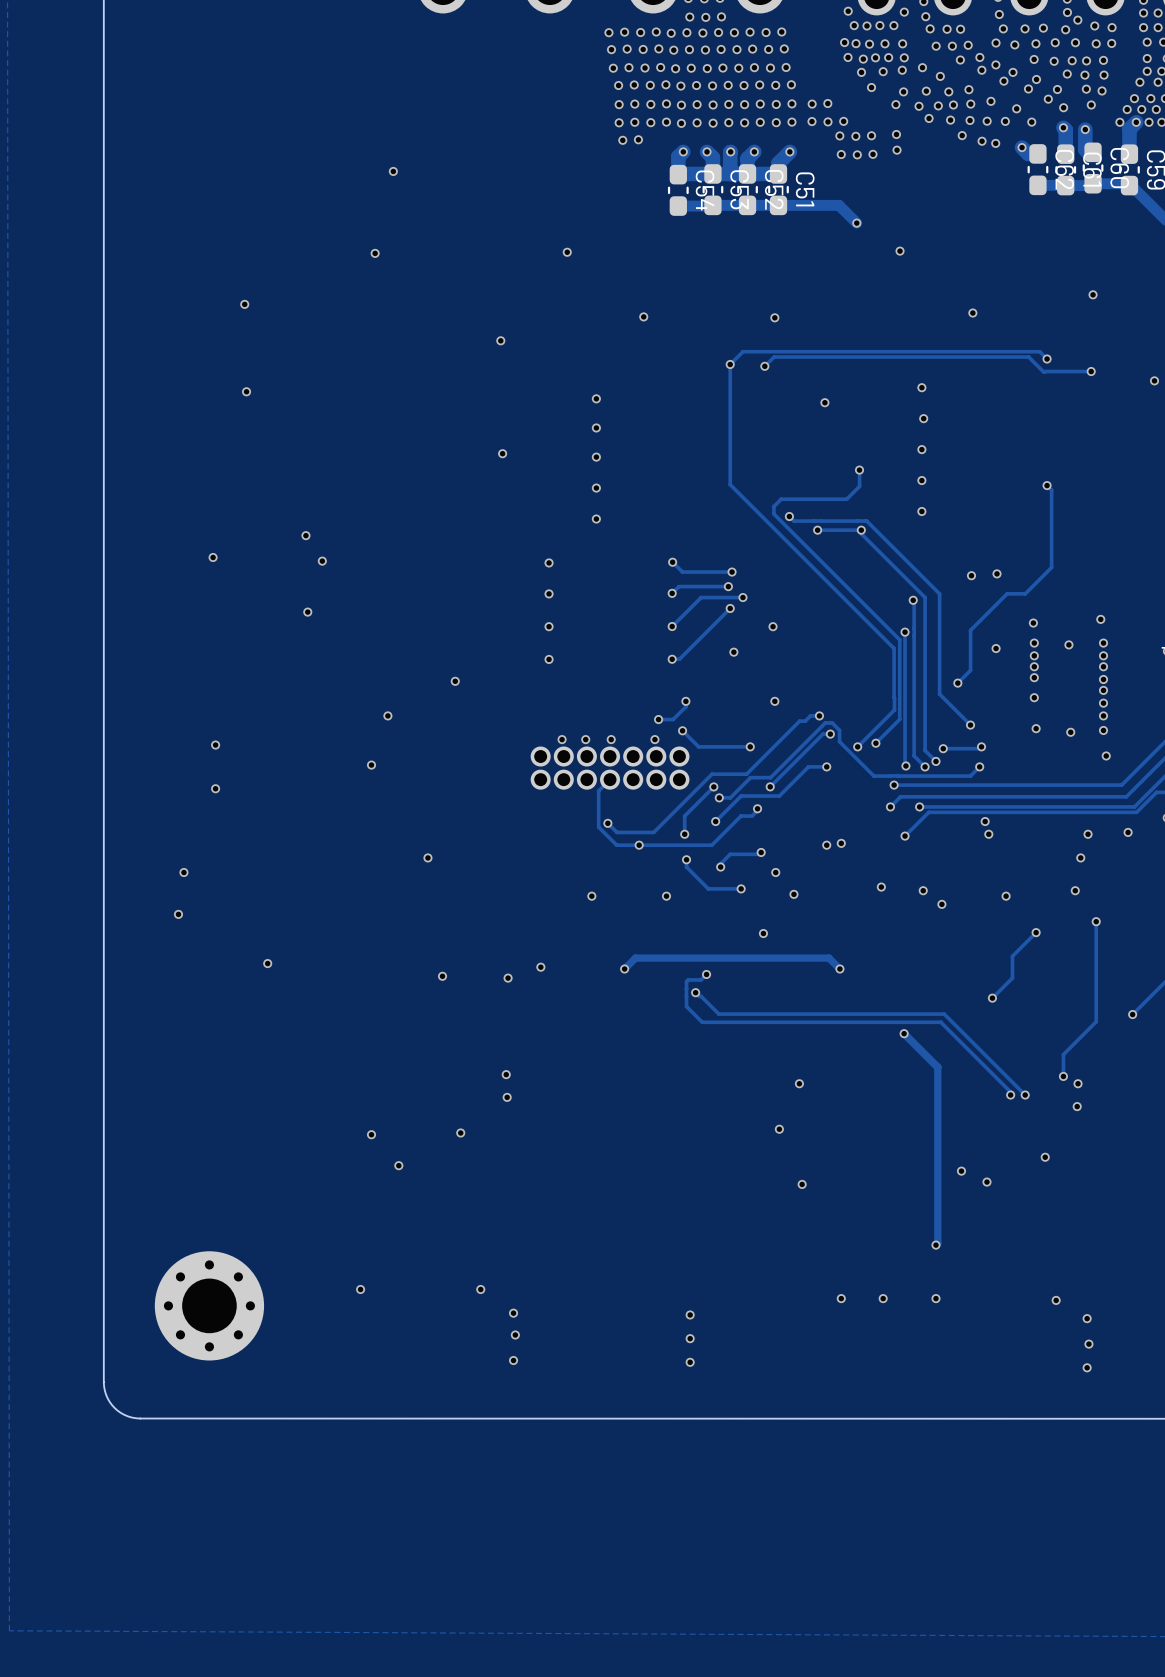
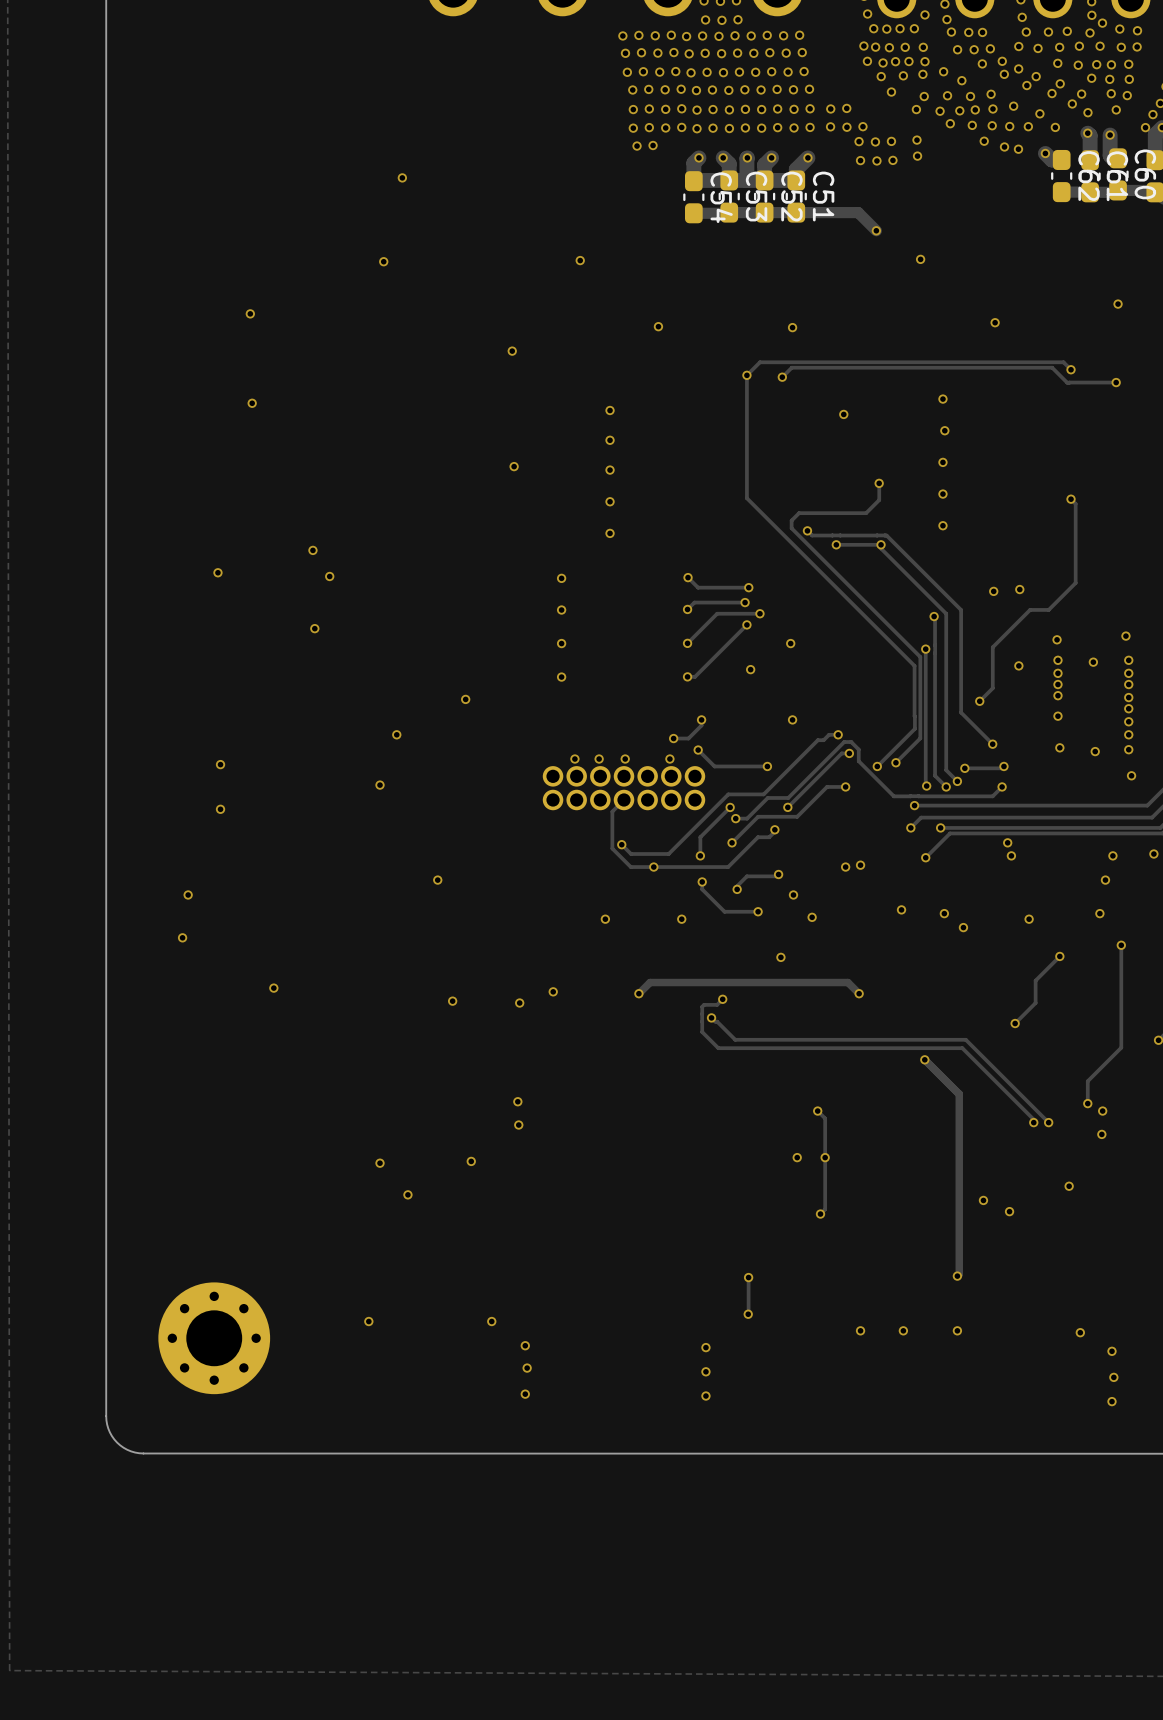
track: none -> (817, 1111) (825, 1118) (825, 1209) (820, 1214)
via: none -> (825, 1157)
track: none -> (748, 1277) (748, 1314)
via: none -> (748, 1277)
via: none -> (748, 1314)

